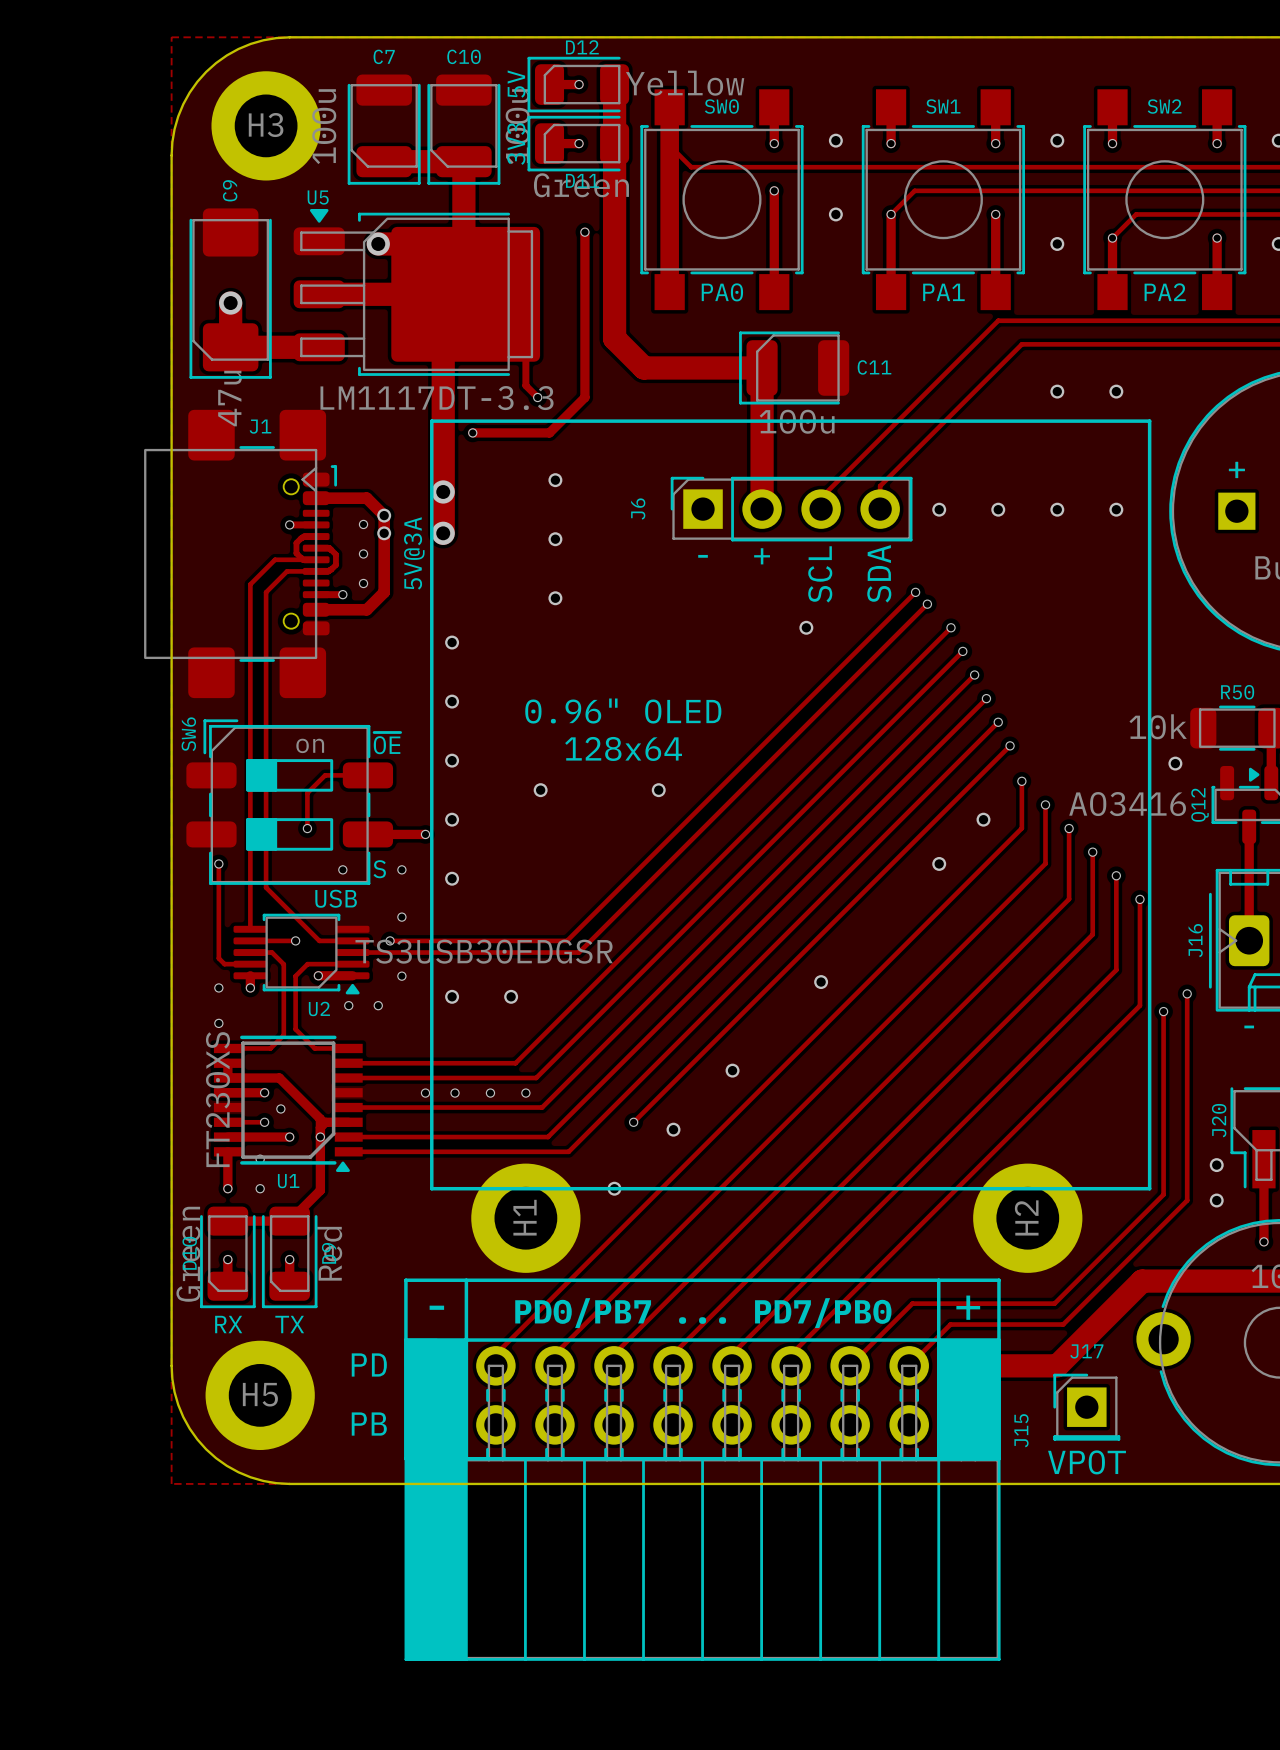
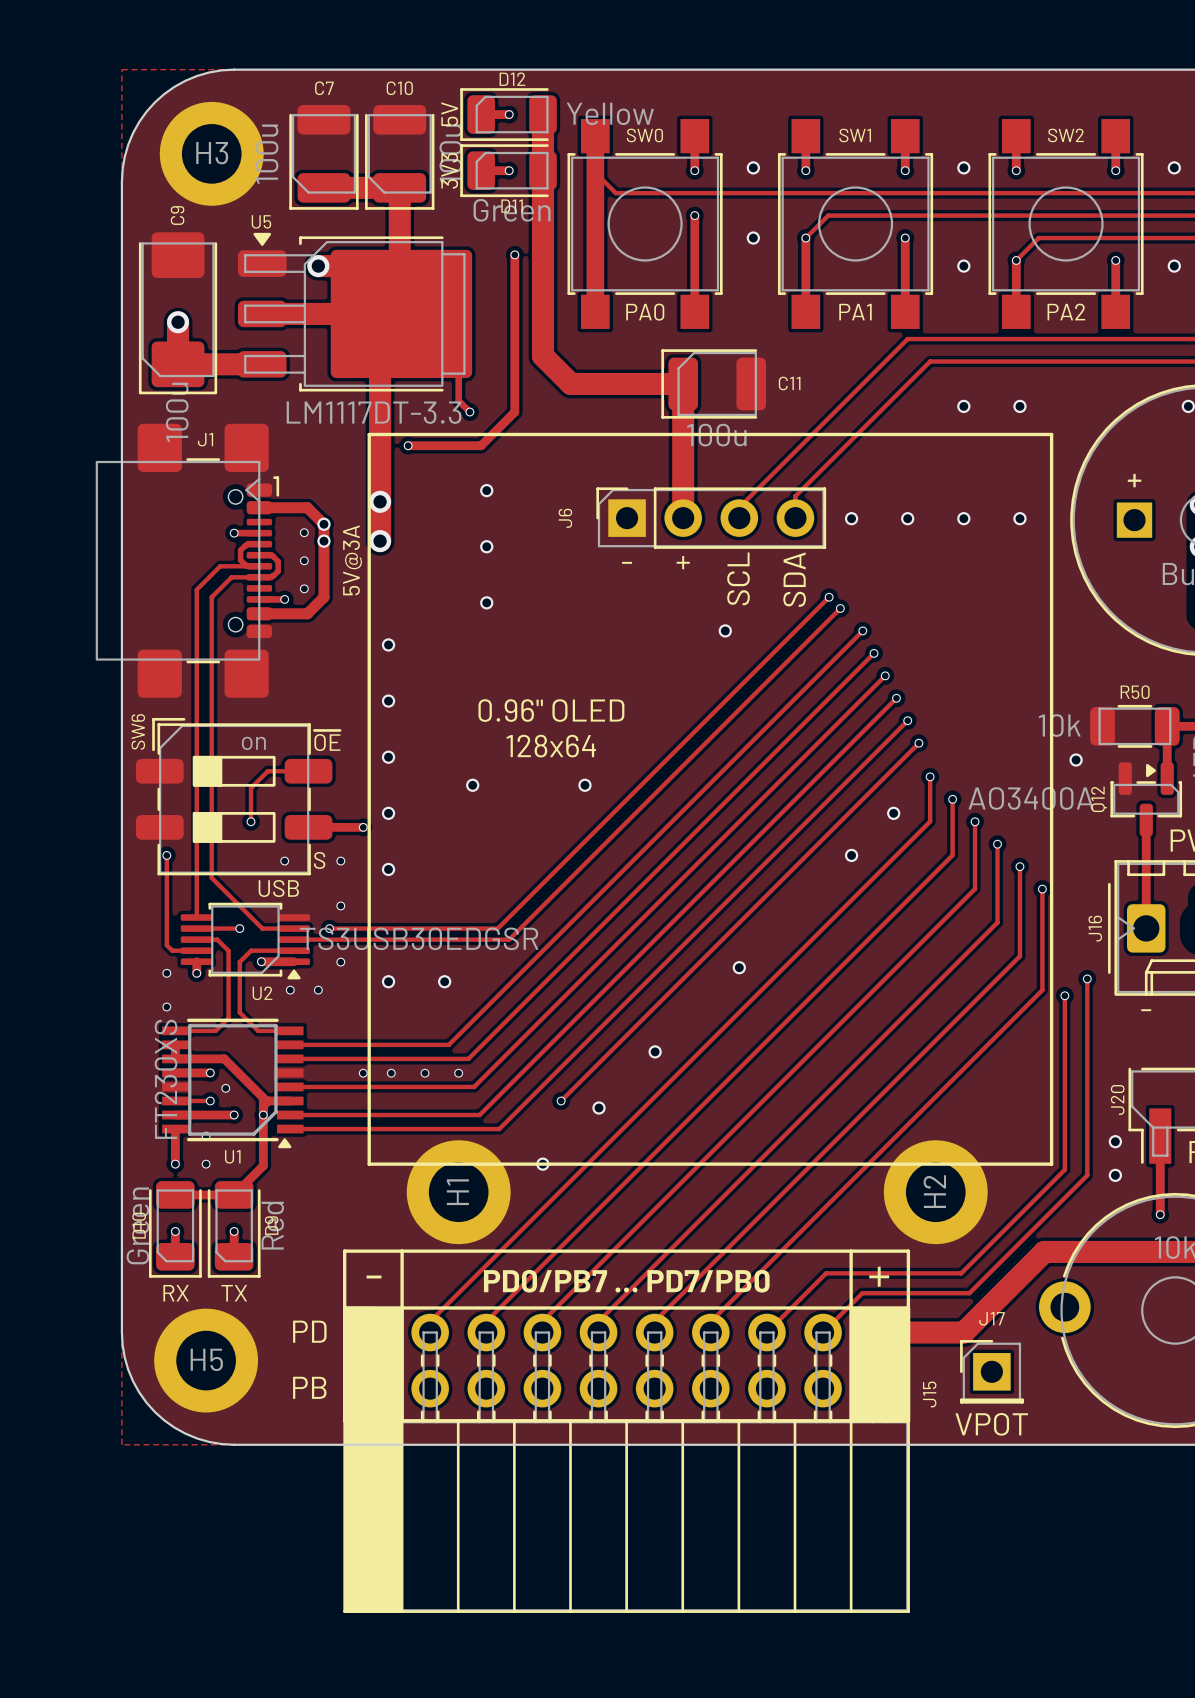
C9 value: 47u (229, 398) -> 100u (177, 412)
Q12 value: AO3416 (1127, 804) -> AO3400A (1031, 798)

